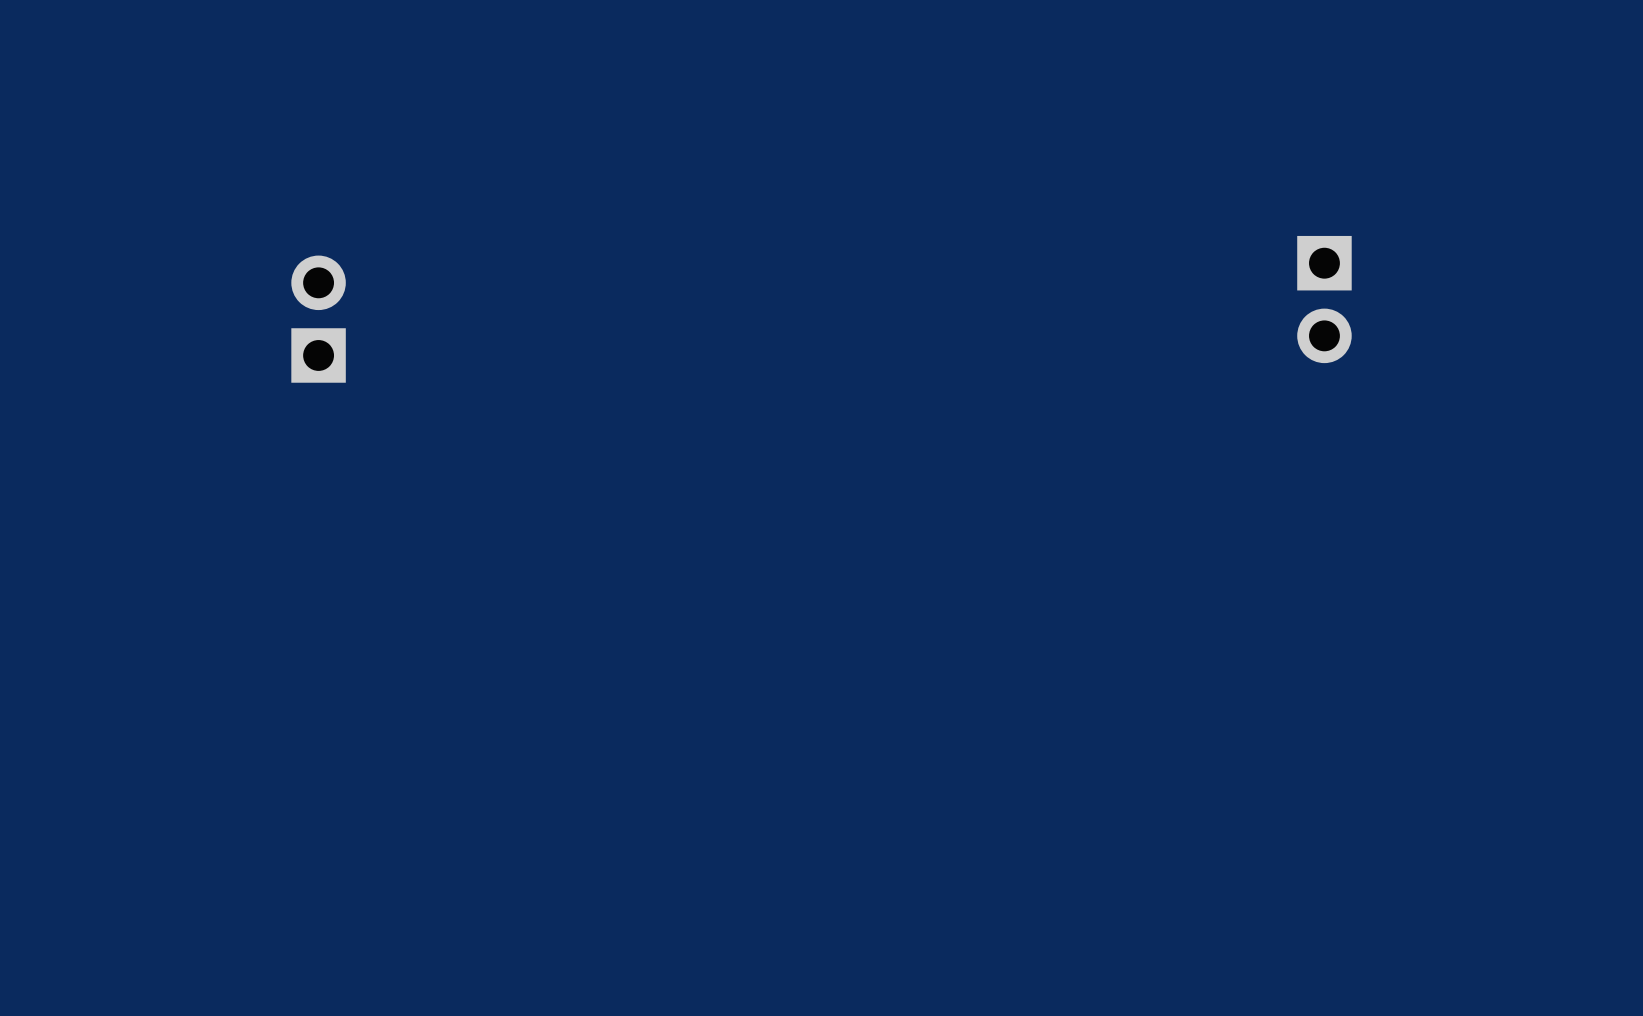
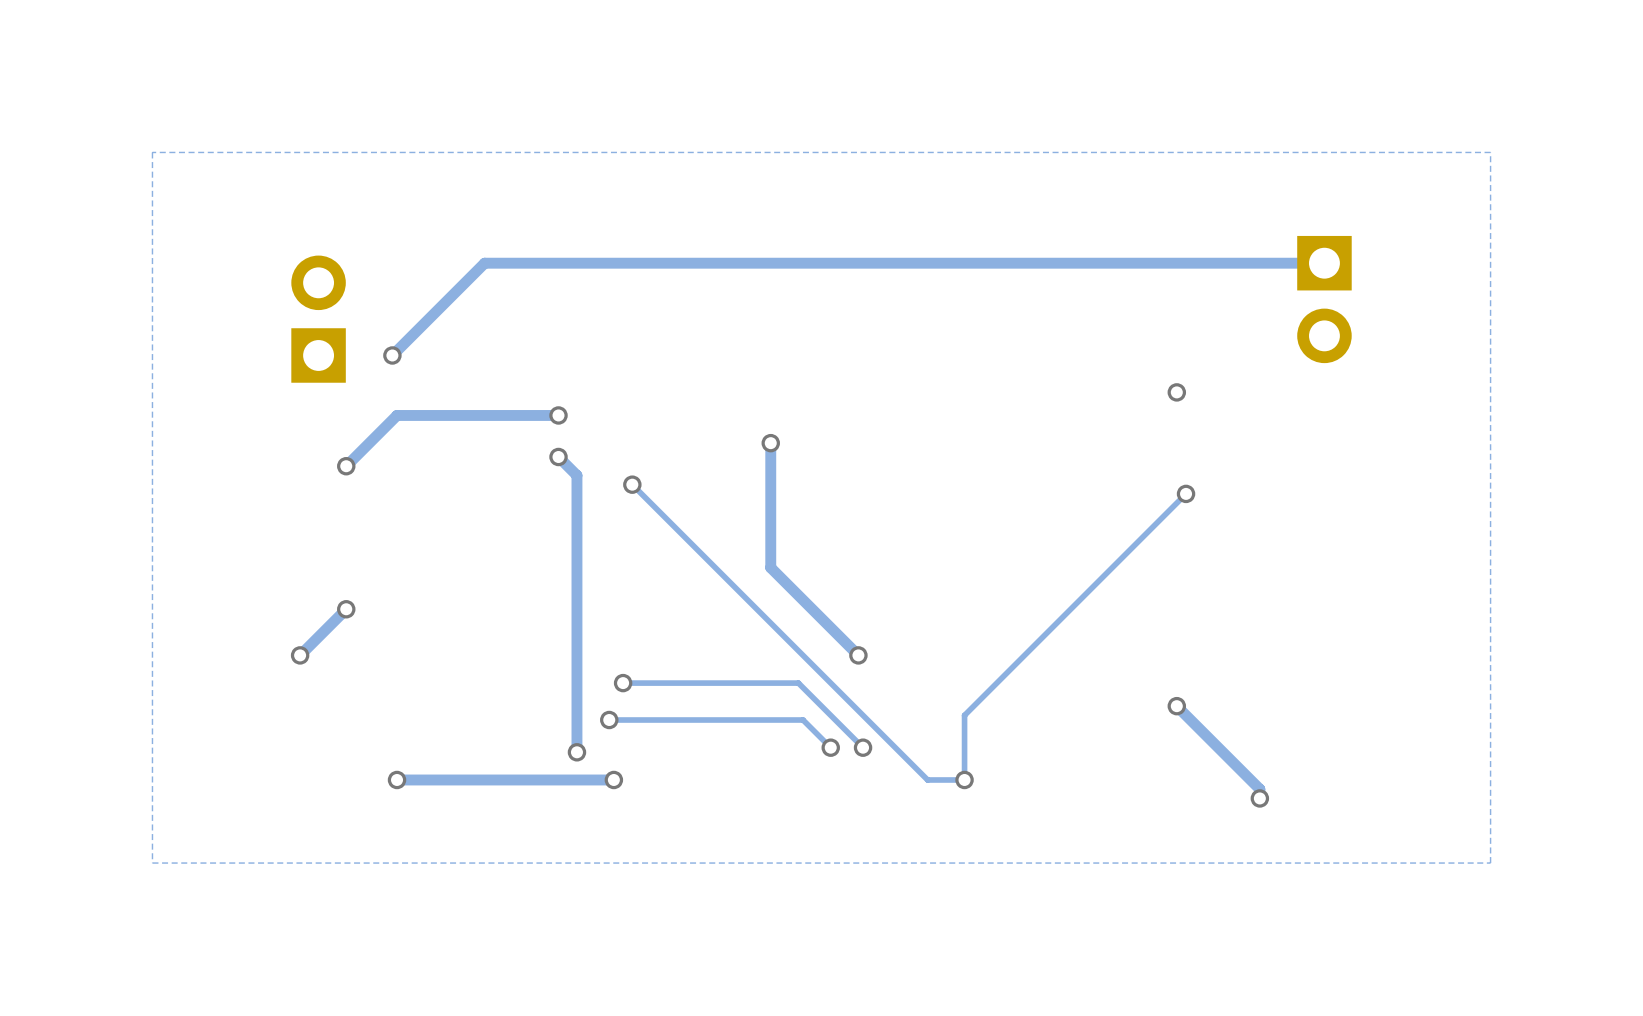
zone outline: none -> (1490, 152) (1490, 863) (152, 863) (152, 152) (1490, 152)
track: none -> (1324, 263) (484, 263) (392, 355)
via: none -> (392, 355)
via: none -> (1176, 392)
track: none -> (558, 415) (397, 415) (346, 466)
via: none -> (558, 415)
track: none -> (770, 443) (770, 567) (858, 655)
via: none -> (770, 443)
track: none -> (558, 456) (576, 475) (576, 752)
via: none -> (558, 456)
via: none -> (346, 466)
track: none -> (632, 484) (927, 779) (964, 779) (964, 715) (1186, 493)
via: none -> (632, 484)
via: none -> (1186, 493)
track: none -> (346, 609) (300, 655)
via: none -> (346, 609)
via: none -> (300, 655)
via: none -> (858, 655)
track: none -> (623, 683) (798, 683) (863, 747)
via: none -> (623, 683)
track: none -> (1176, 706) (1259, 789) (1259, 798)
via: none -> (1176, 706)
track: none -> (609, 720) (803, 720) (830, 747)
via: none -> (609, 720)
via: none -> (830, 747)
via: none -> (863, 747)
via: none -> (576, 752)
via: none -> (397, 779)
track: none -> (613, 779) (397, 779)
via: none -> (613, 779)
via: none -> (964, 779)
via: none -> (1259, 798)

